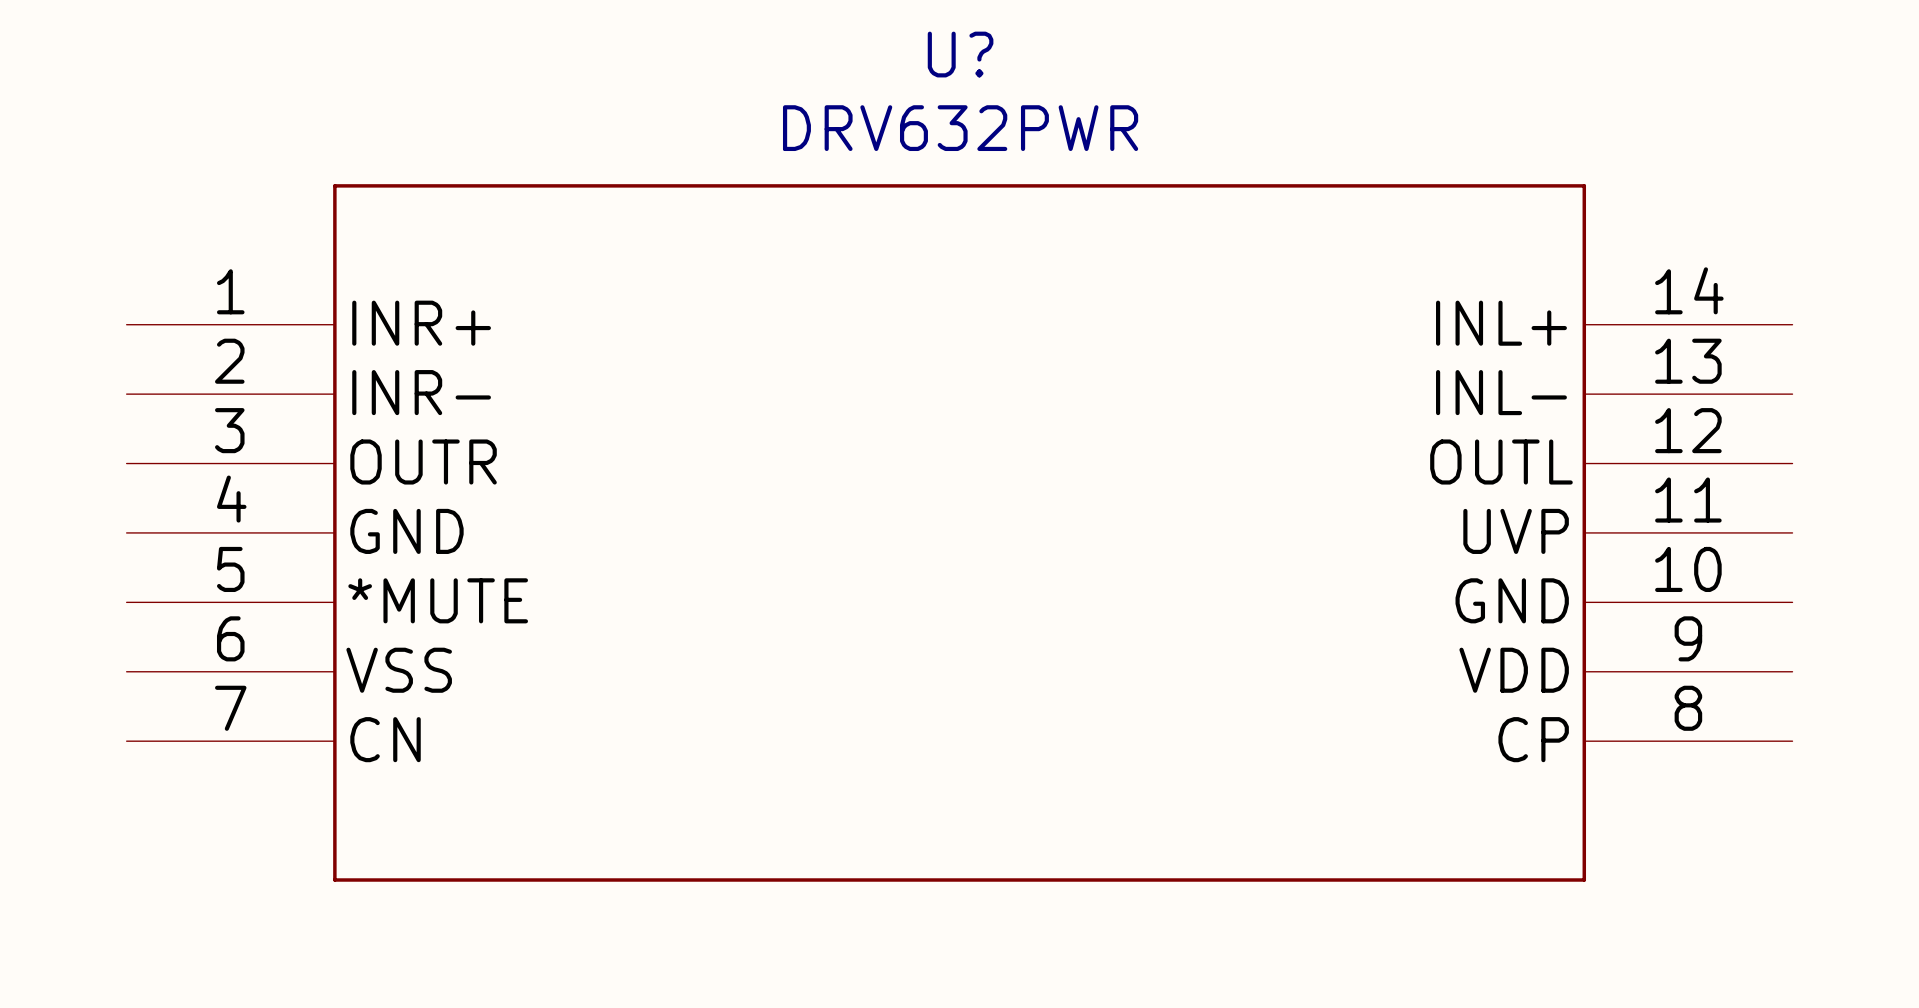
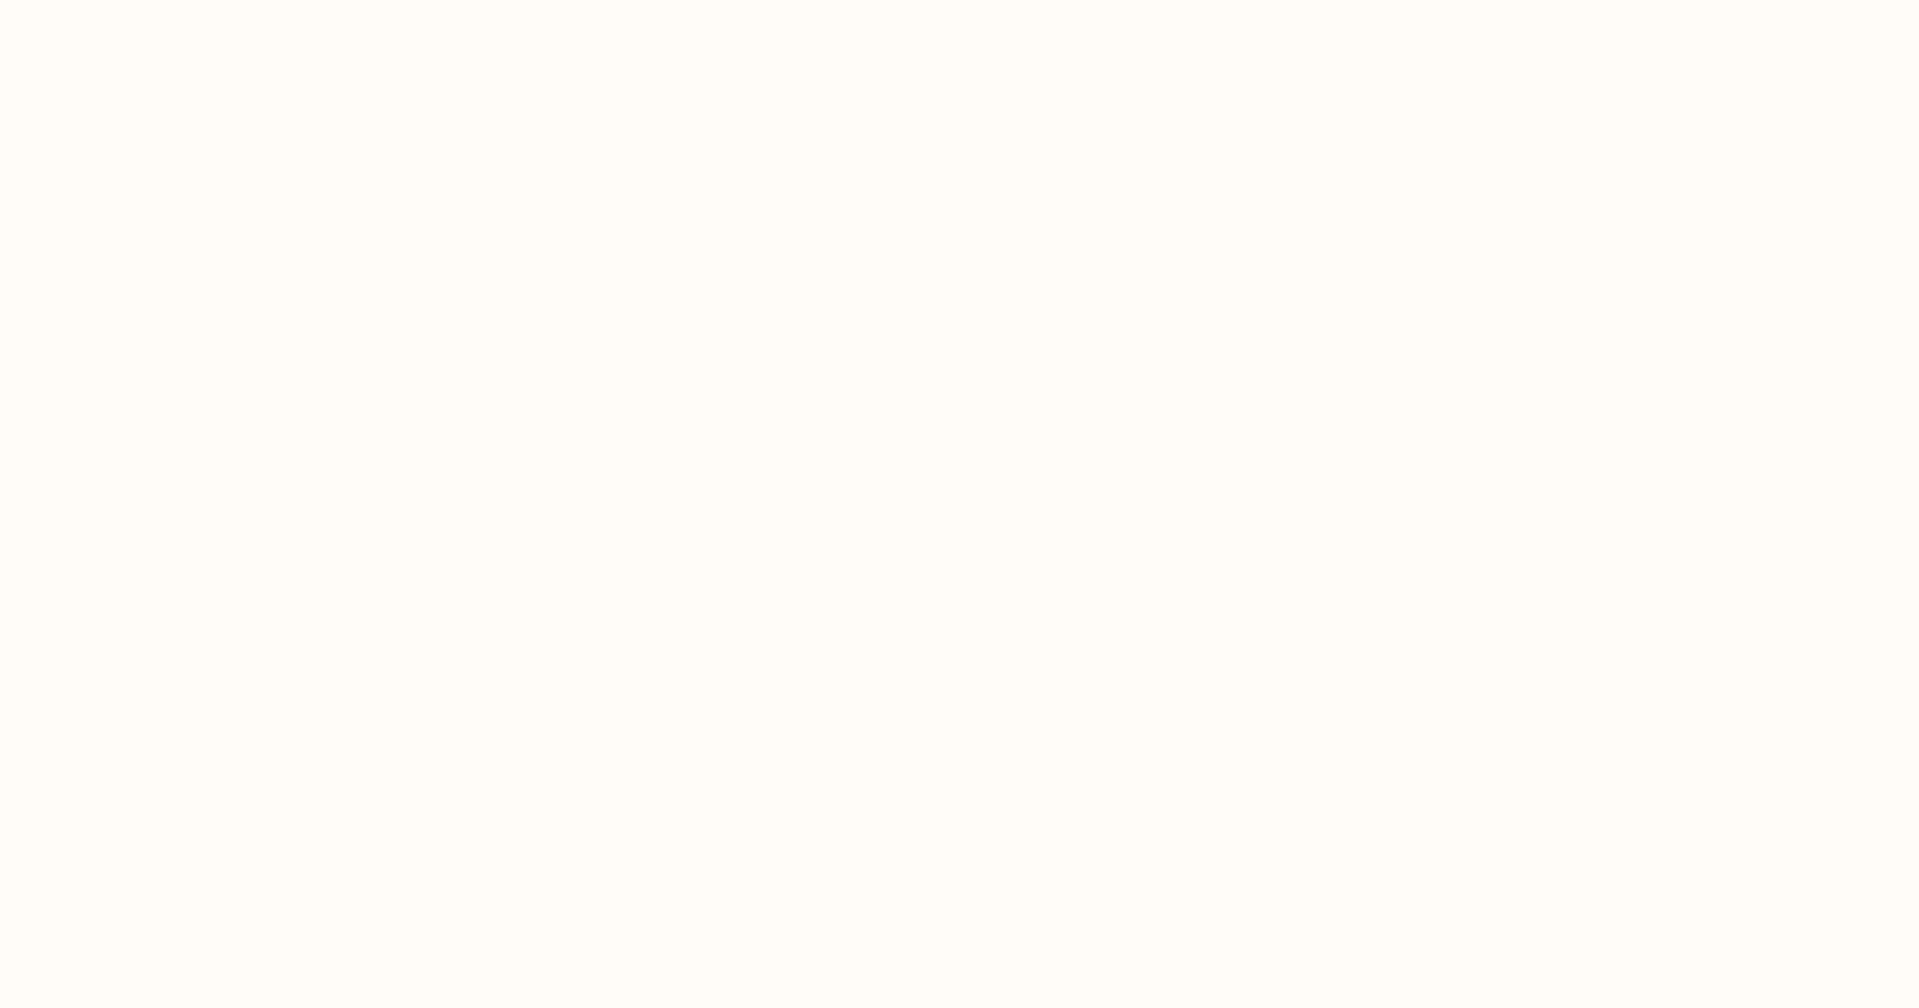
U?: DRV632PWR (959, 532) -> none

